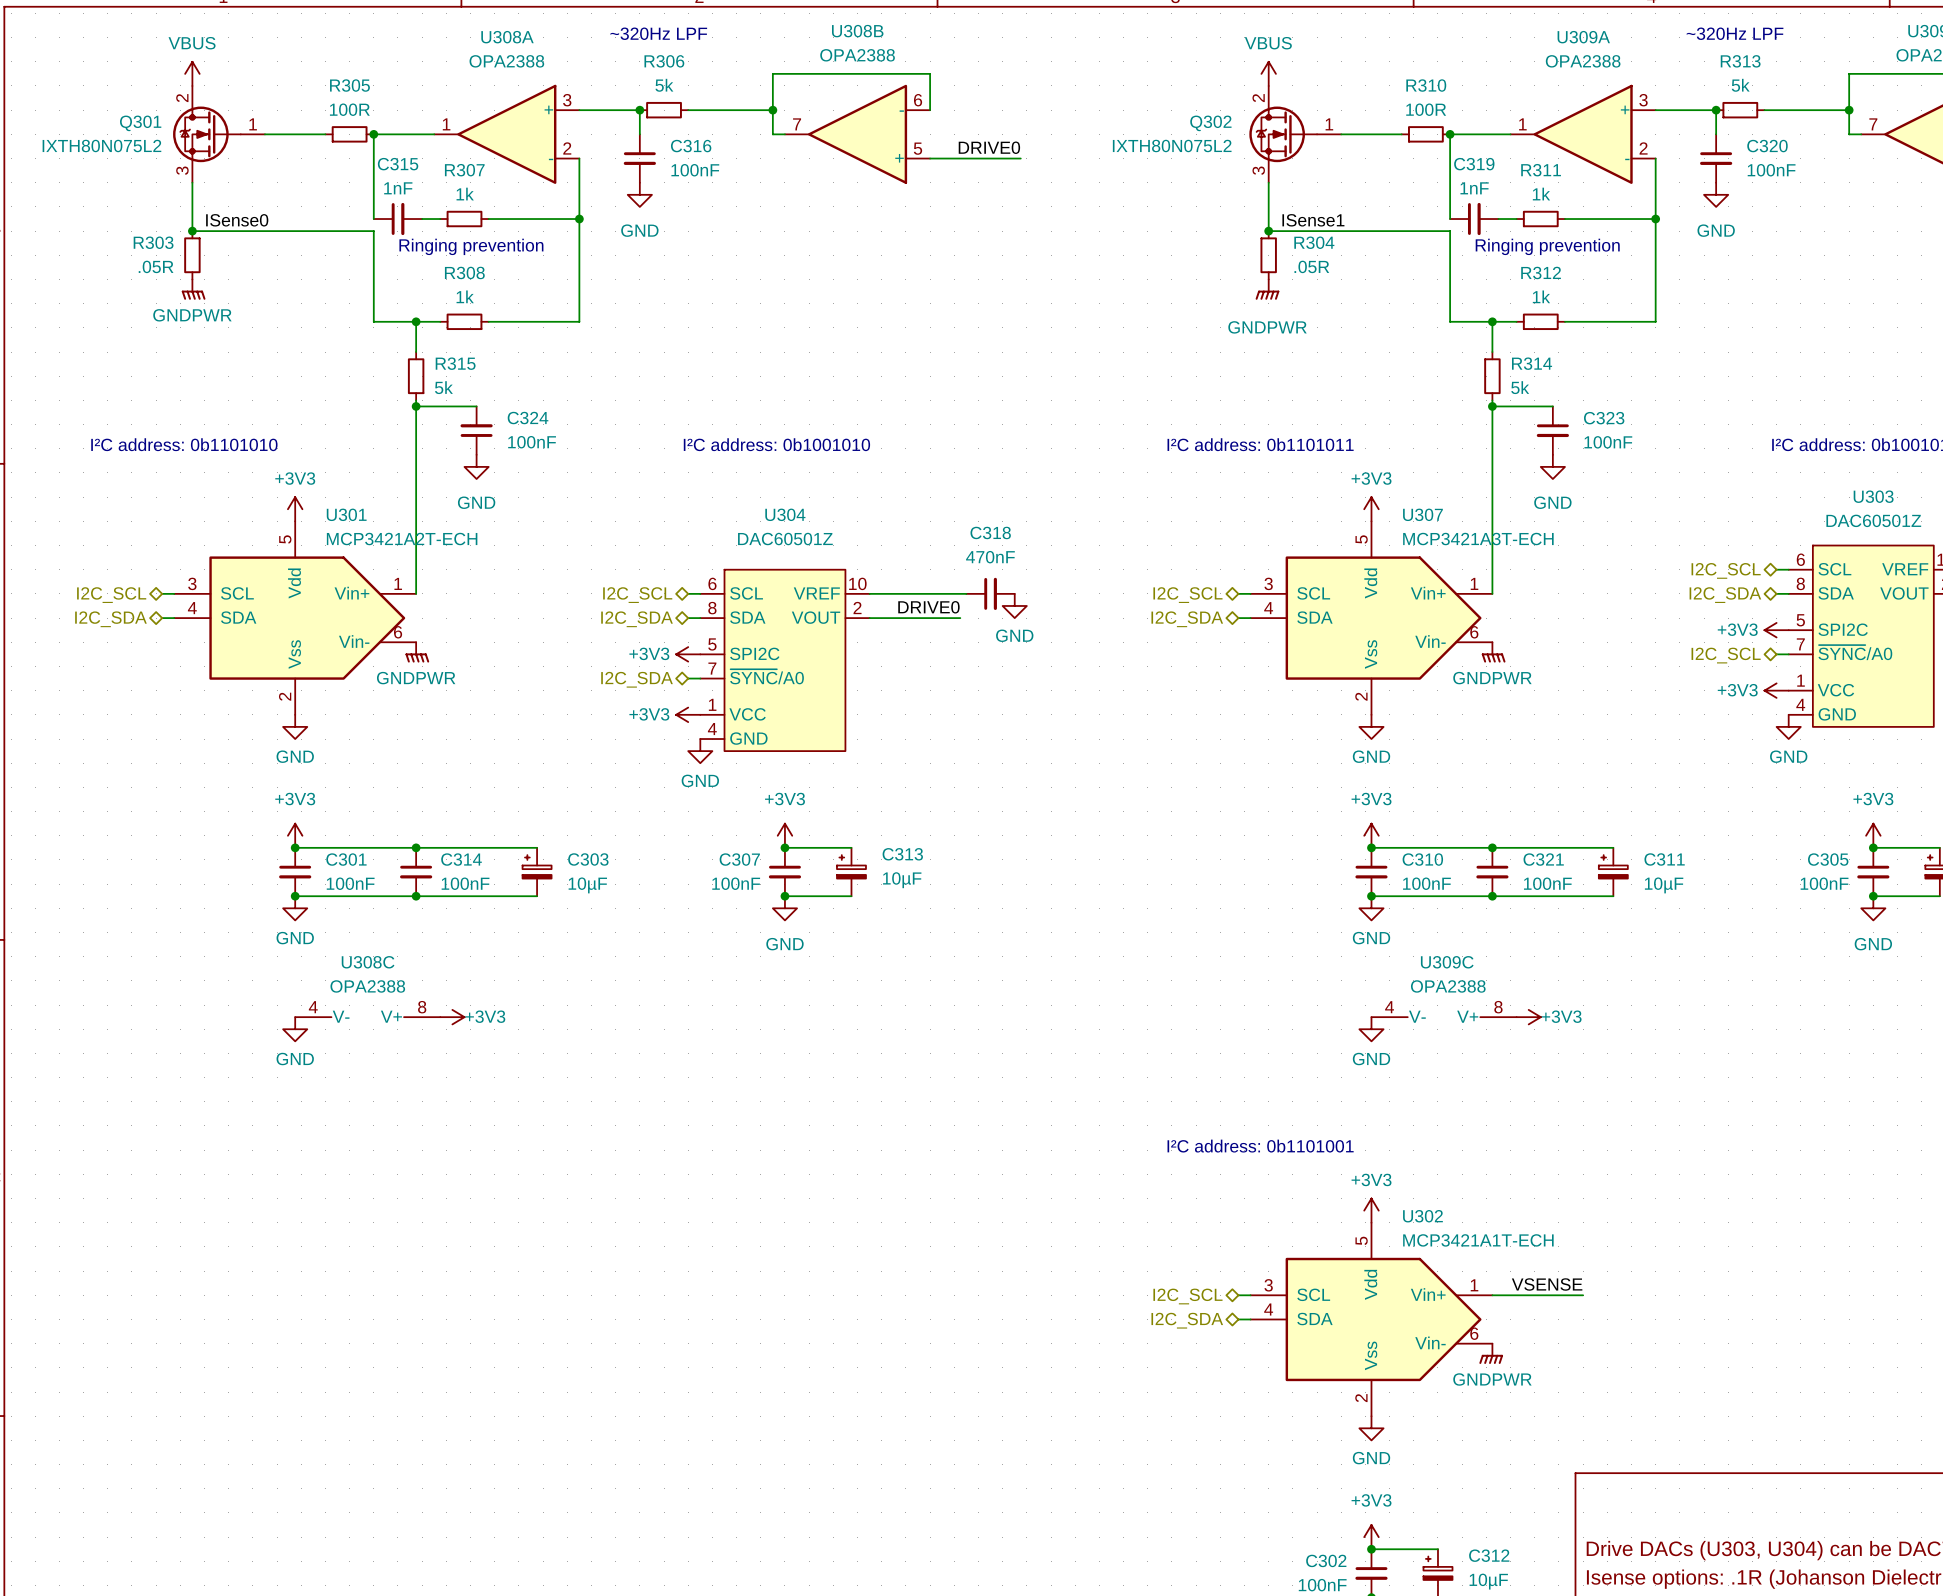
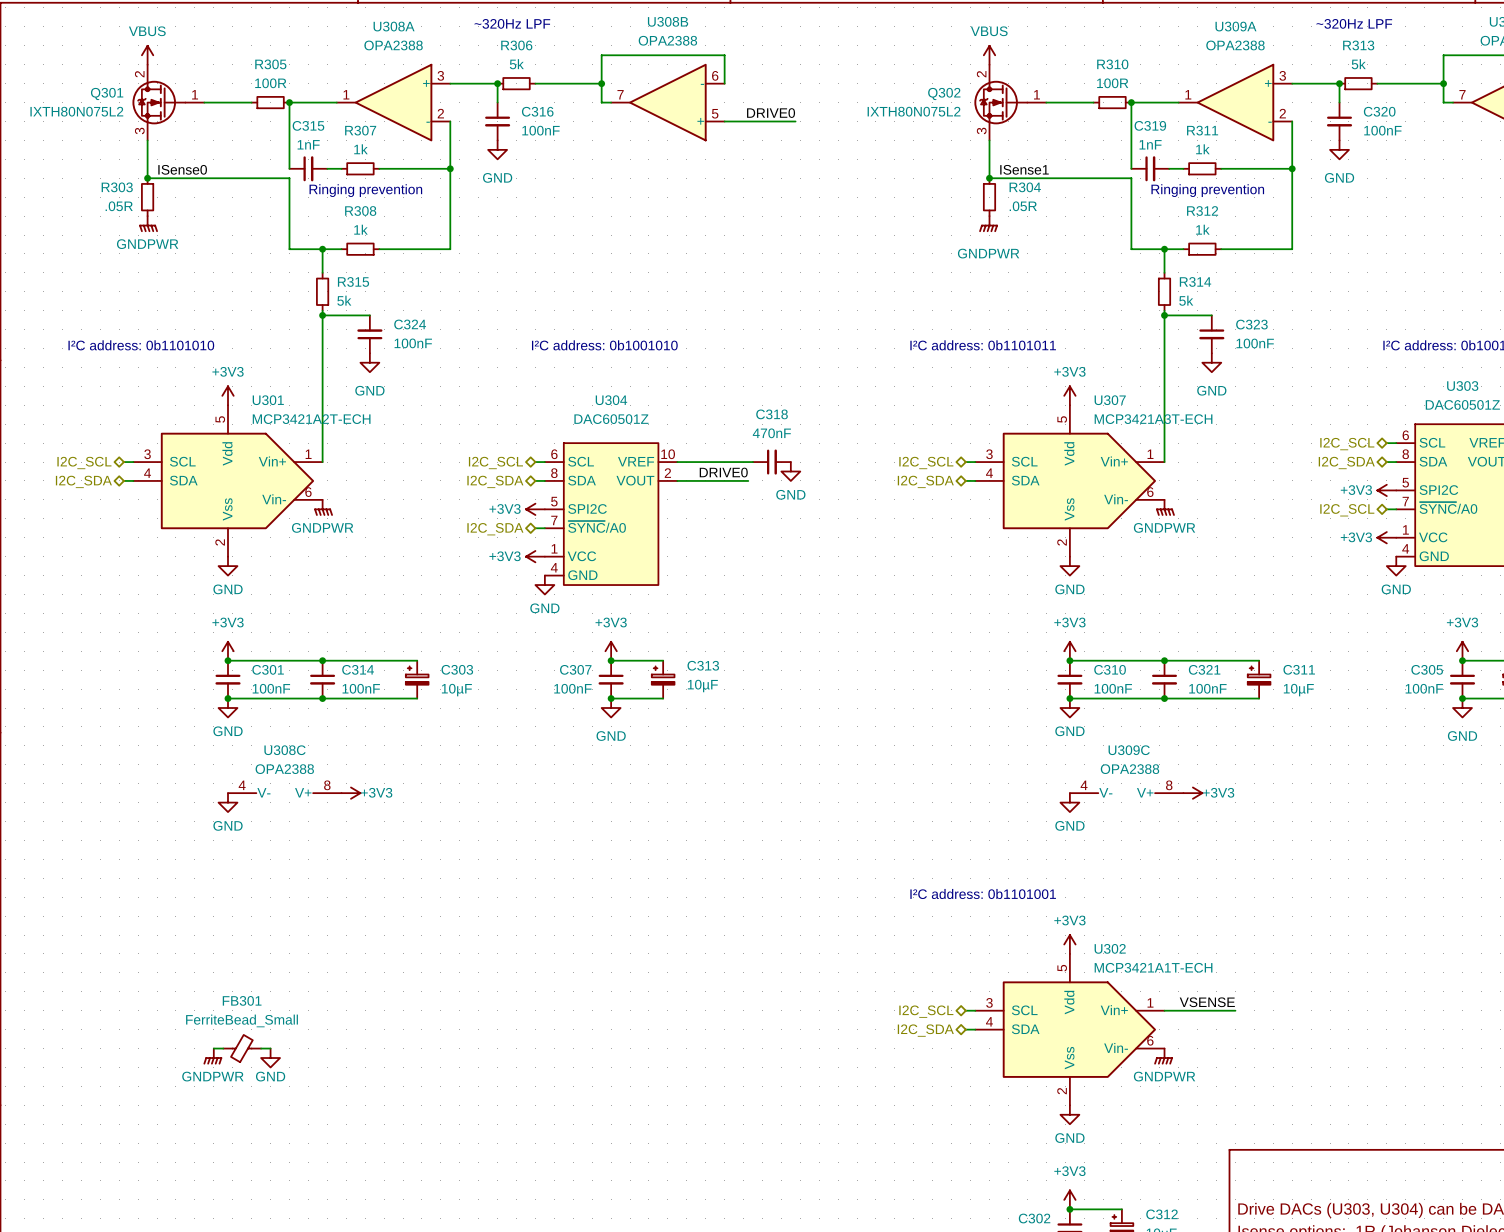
wire: none -> (213, 1048) (223, 1048)
FB301: none -> FerriteBead_Small (242, 1048)
wire: none -> (261, 1048) (270, 1048)
power symbol: none -> GNDPWR (212, 1056)
power symbol: none -> GND (270, 1058)

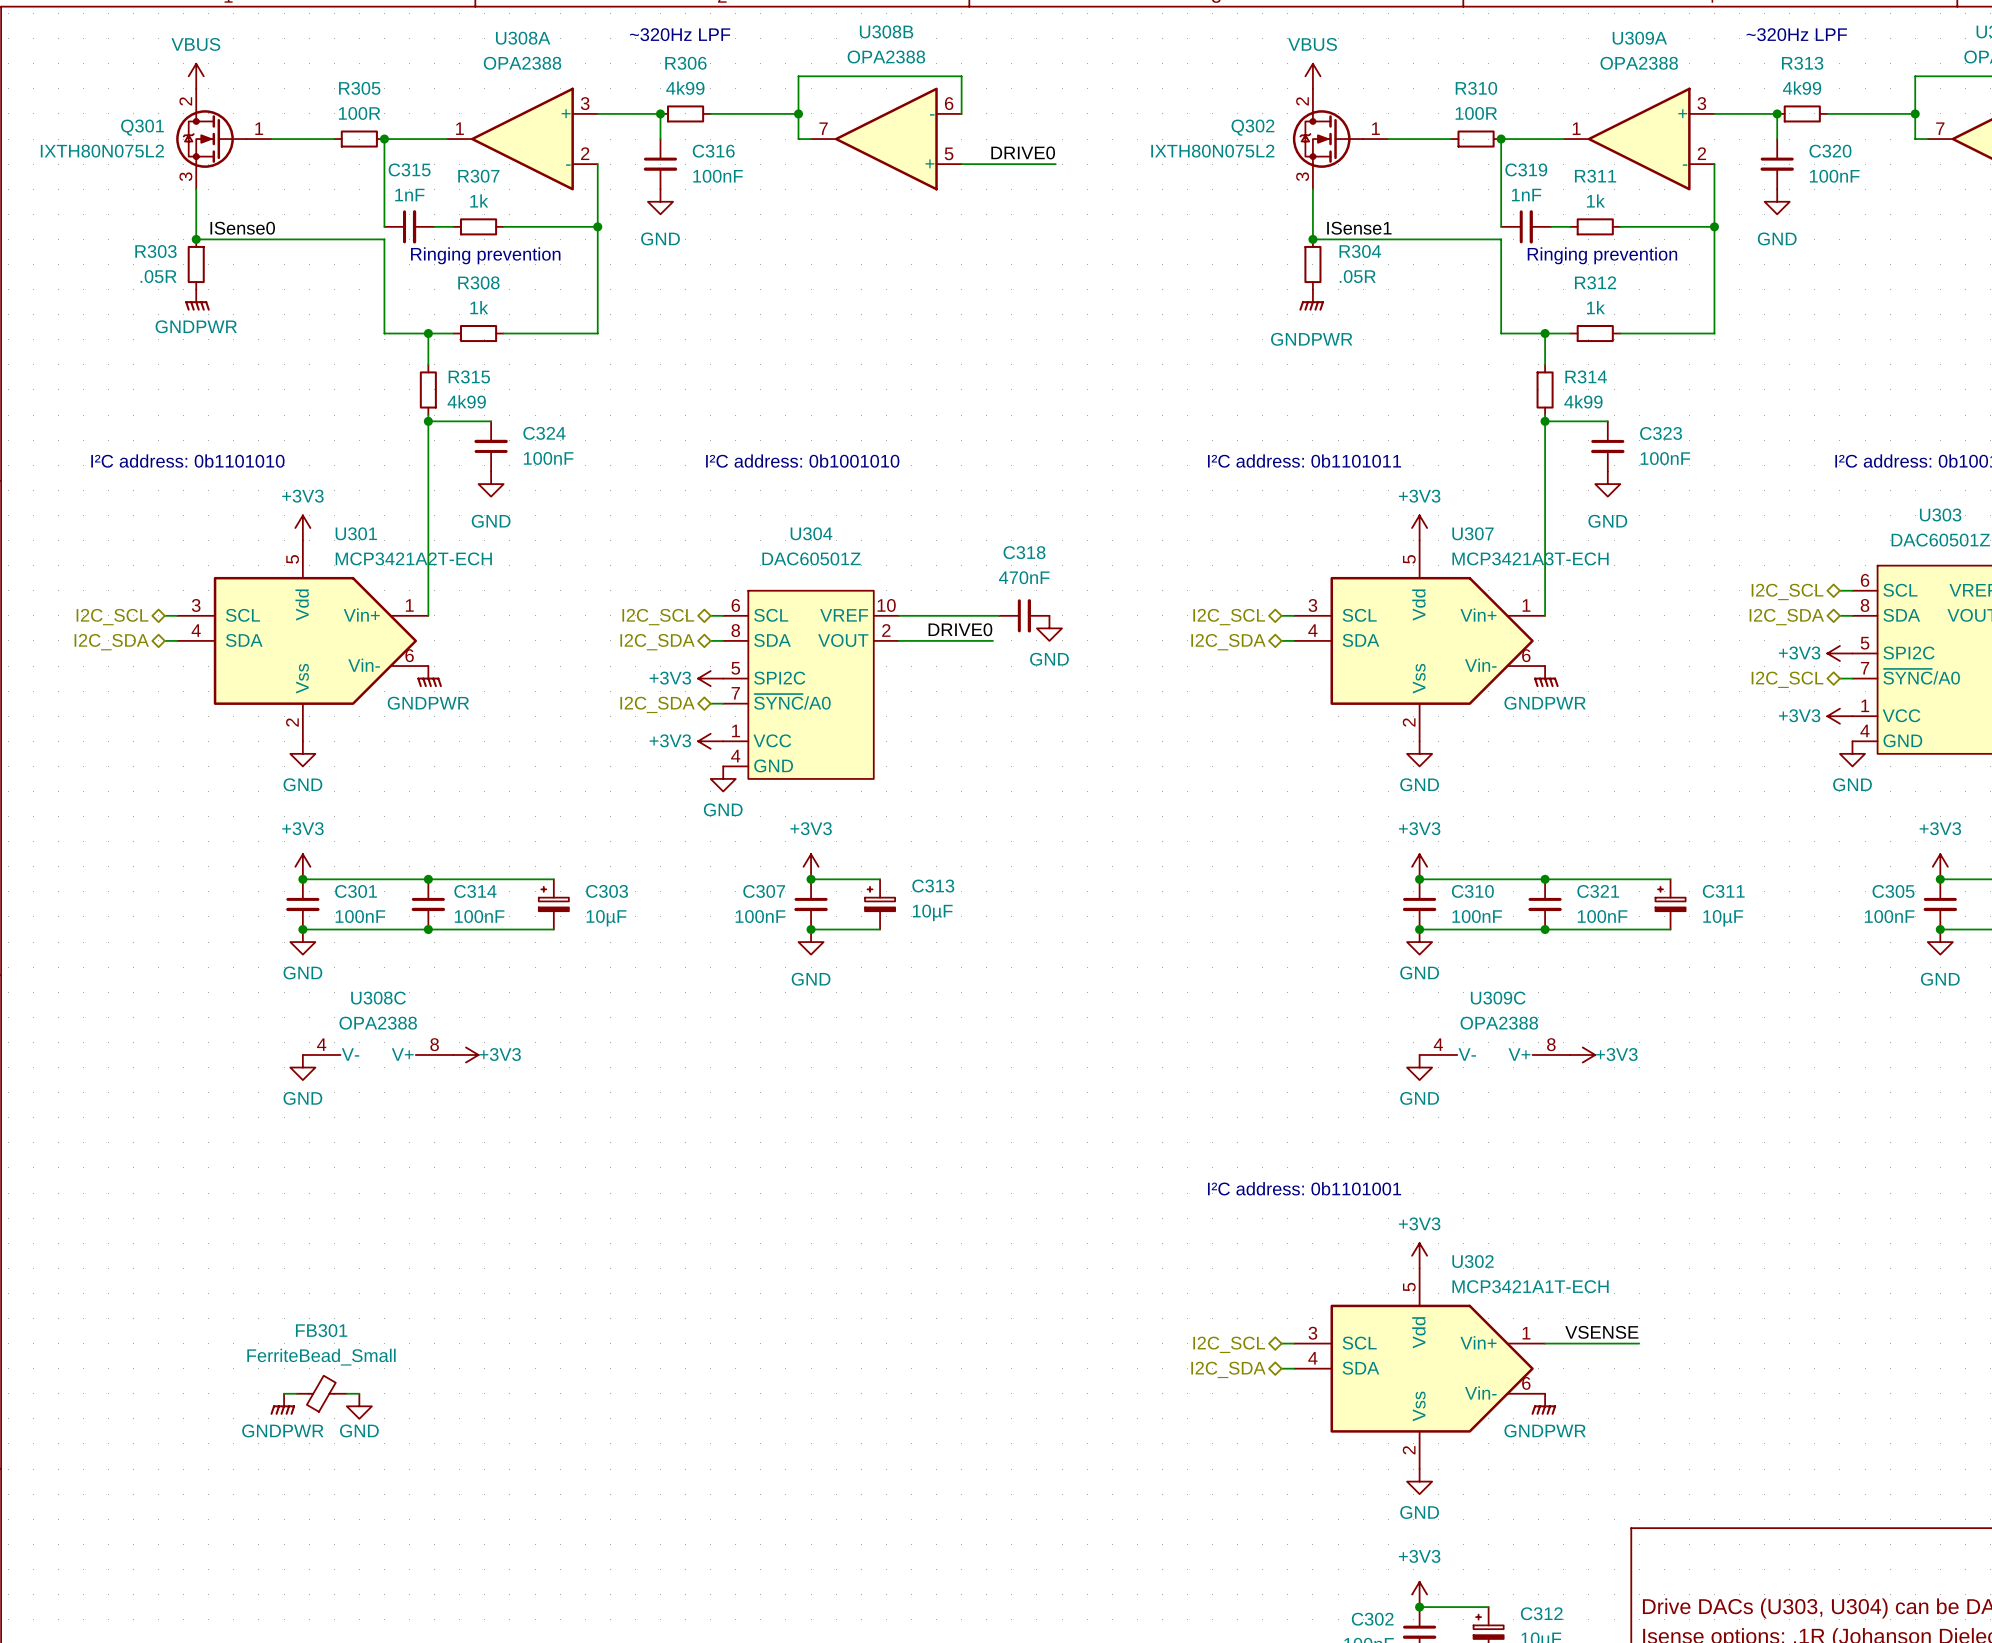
R306 value: 5k (516, 64) -> 4k99 (685, 88)
R313 value: 5k (1358, 64) -> 4k99 (1802, 88)
R315 value: 5k (344, 300) -> 4k99 (466, 401)
R314 value: 5k (1186, 300) -> 4k99 (1583, 401)

